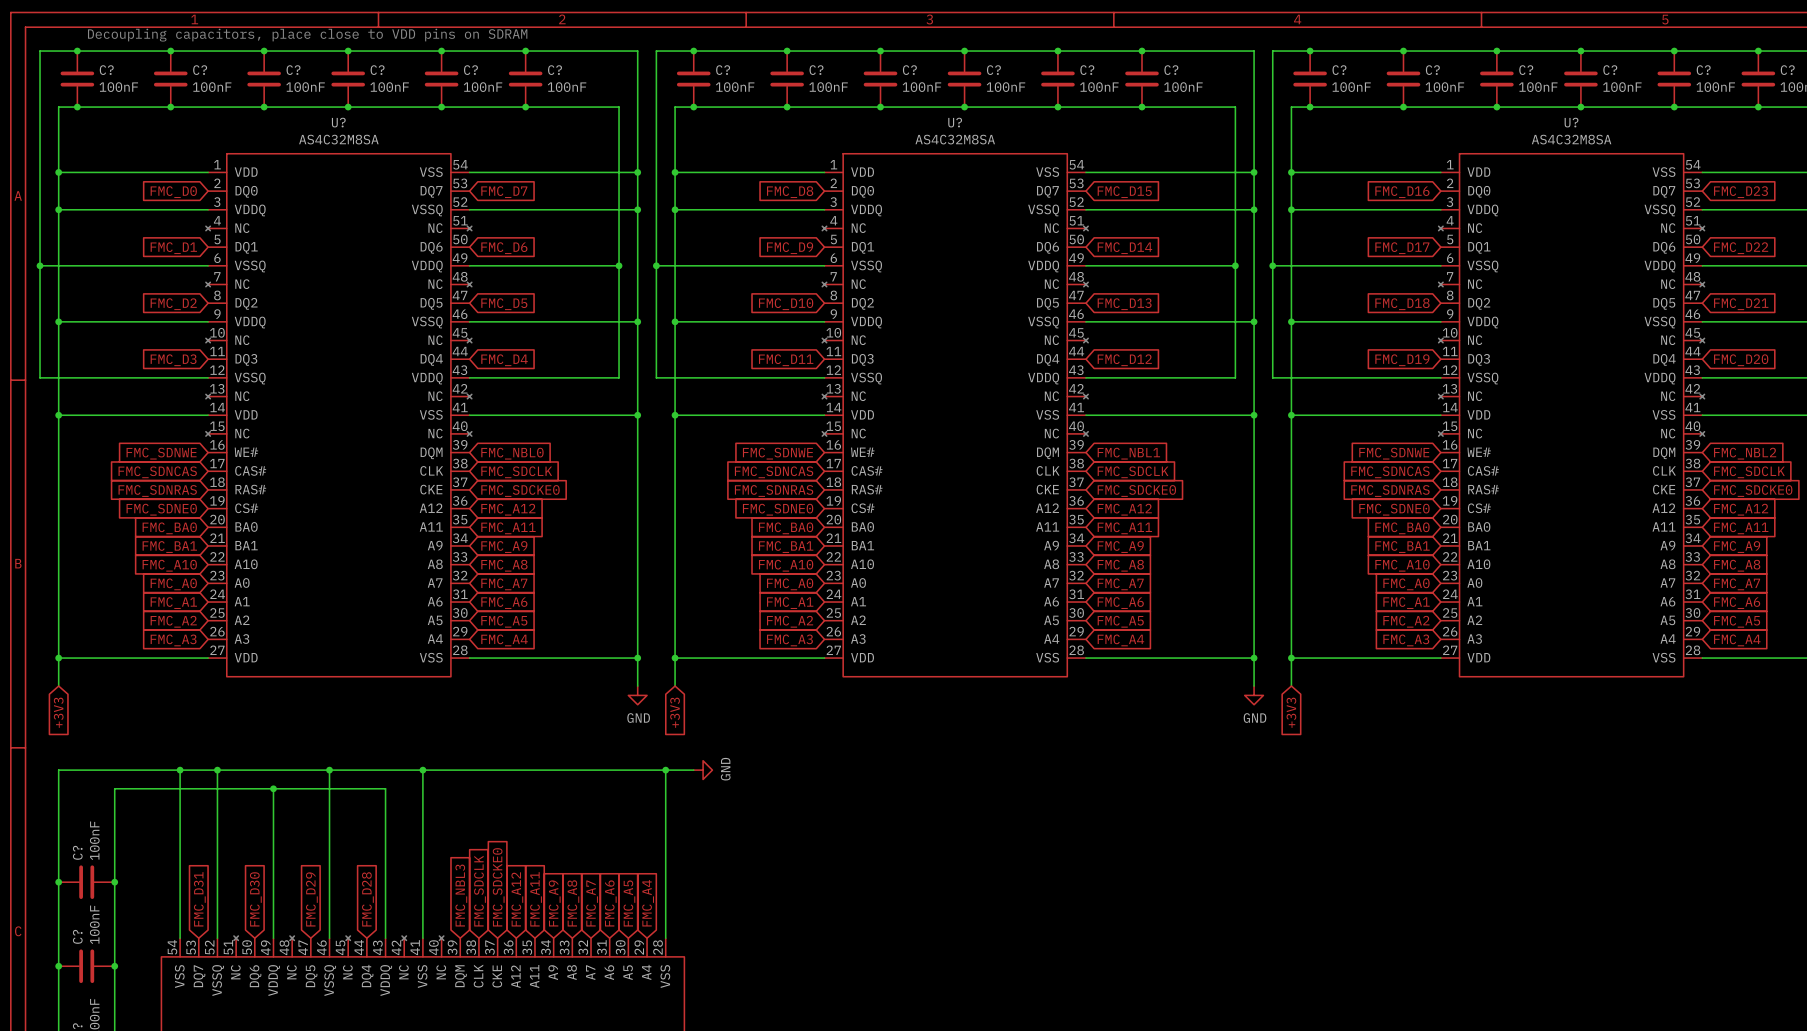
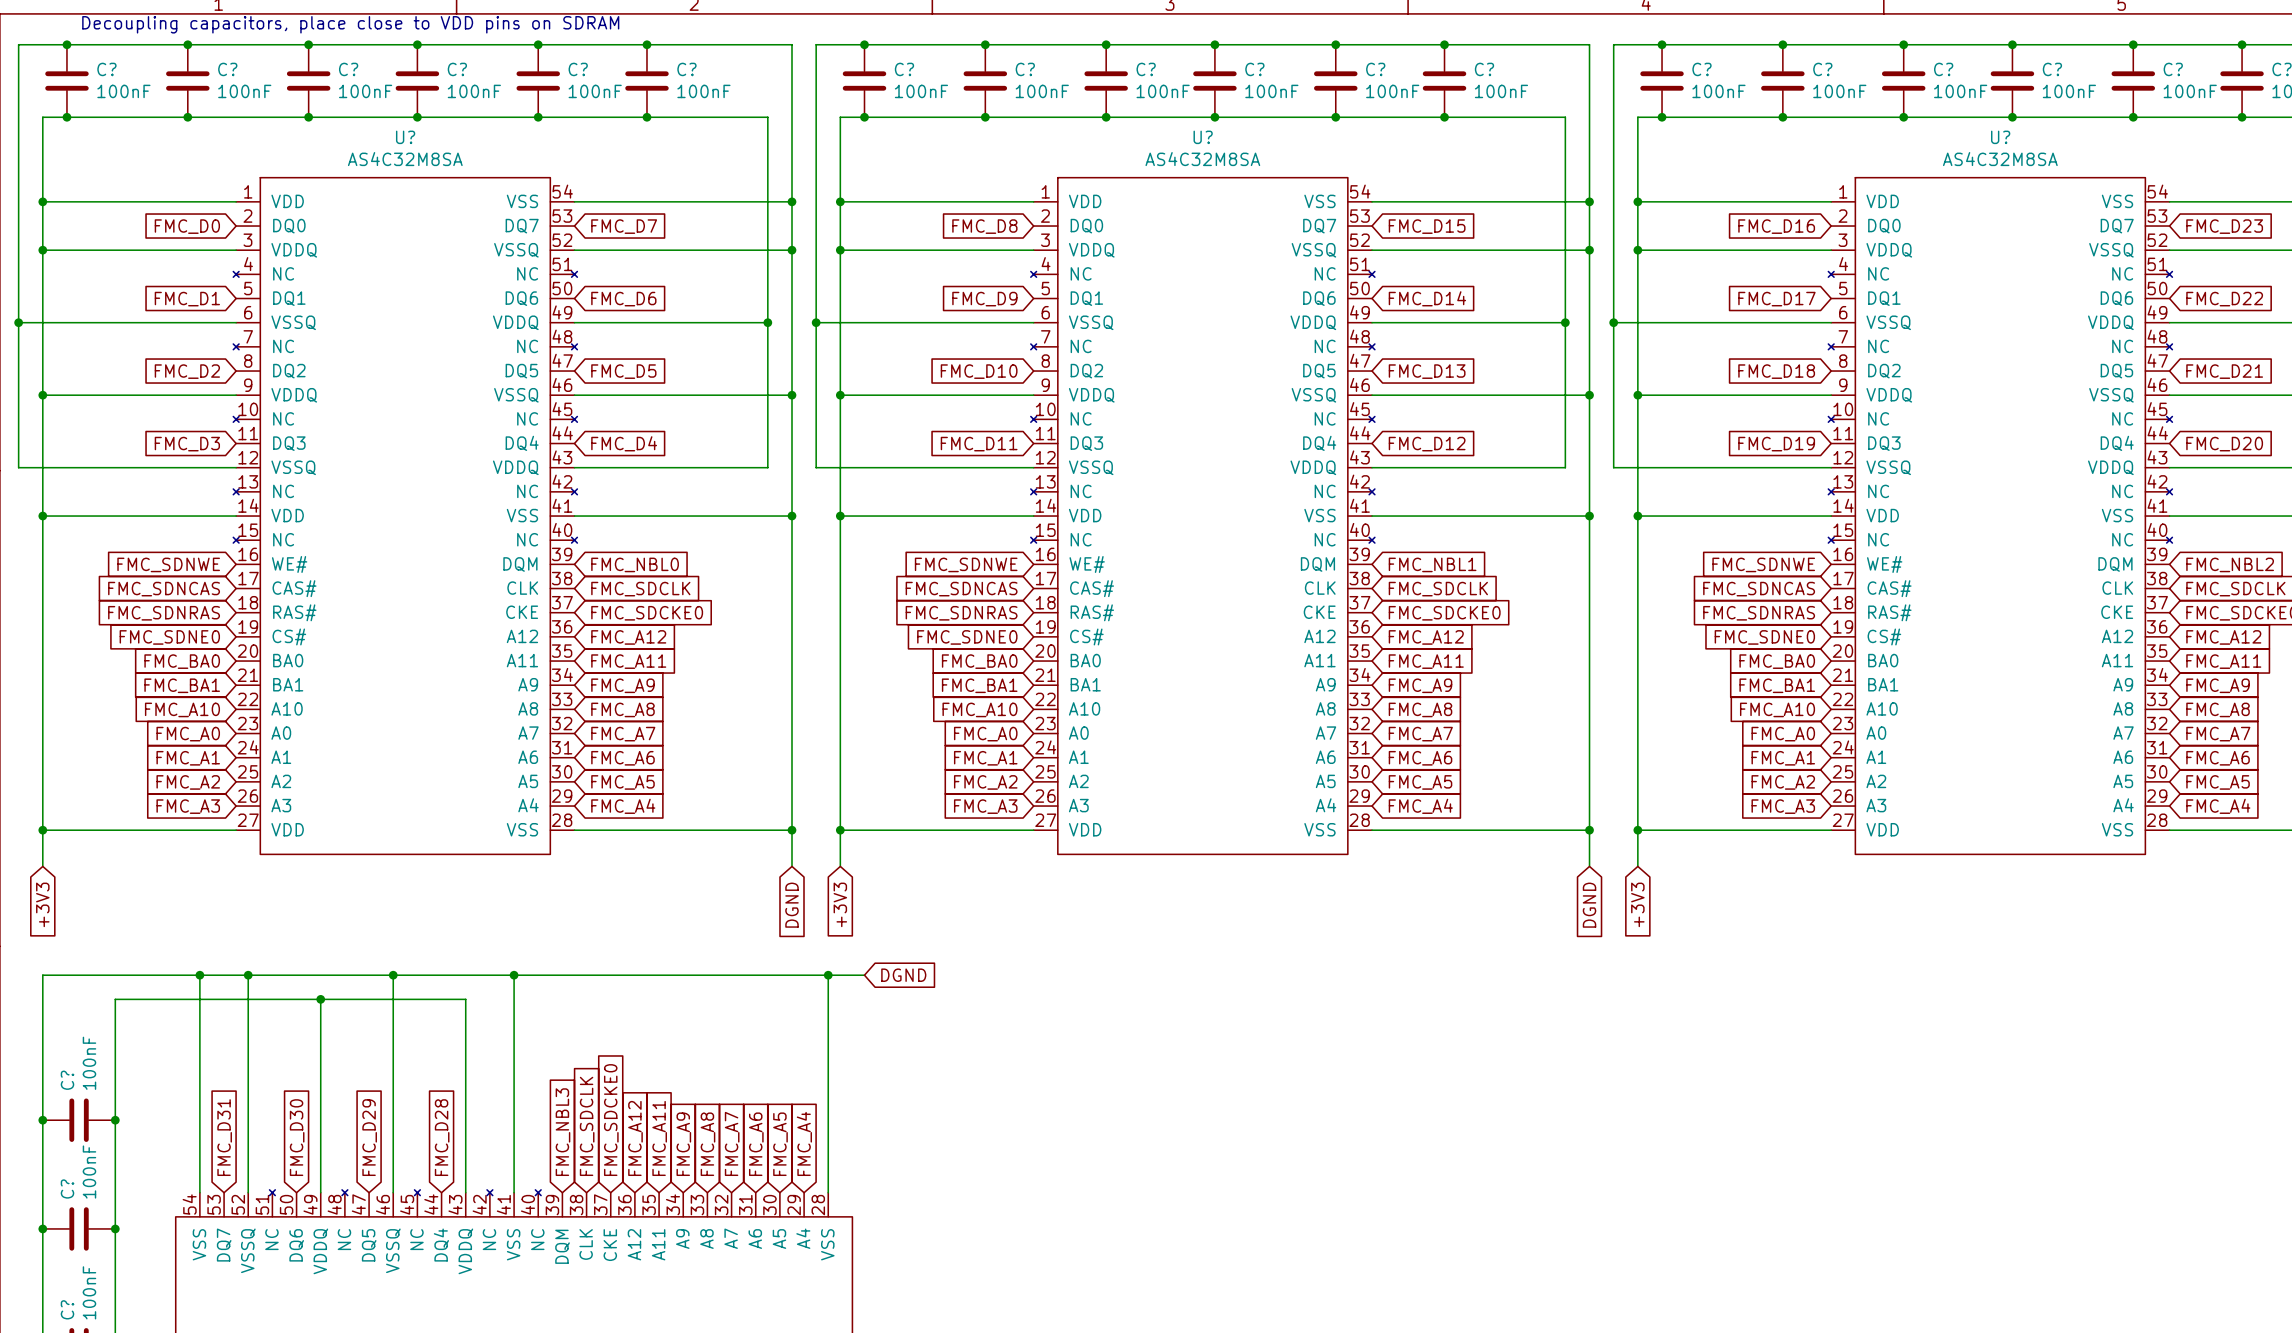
power symbol: GND (637, 695) -> none
power symbol: GND (1254, 695) -> none
global label: none -> DGND (791, 905)
global label: none -> DGND (1589, 905)
power symbol: GND (703, 770) -> none
global label: none -> DGND (903, 975)

